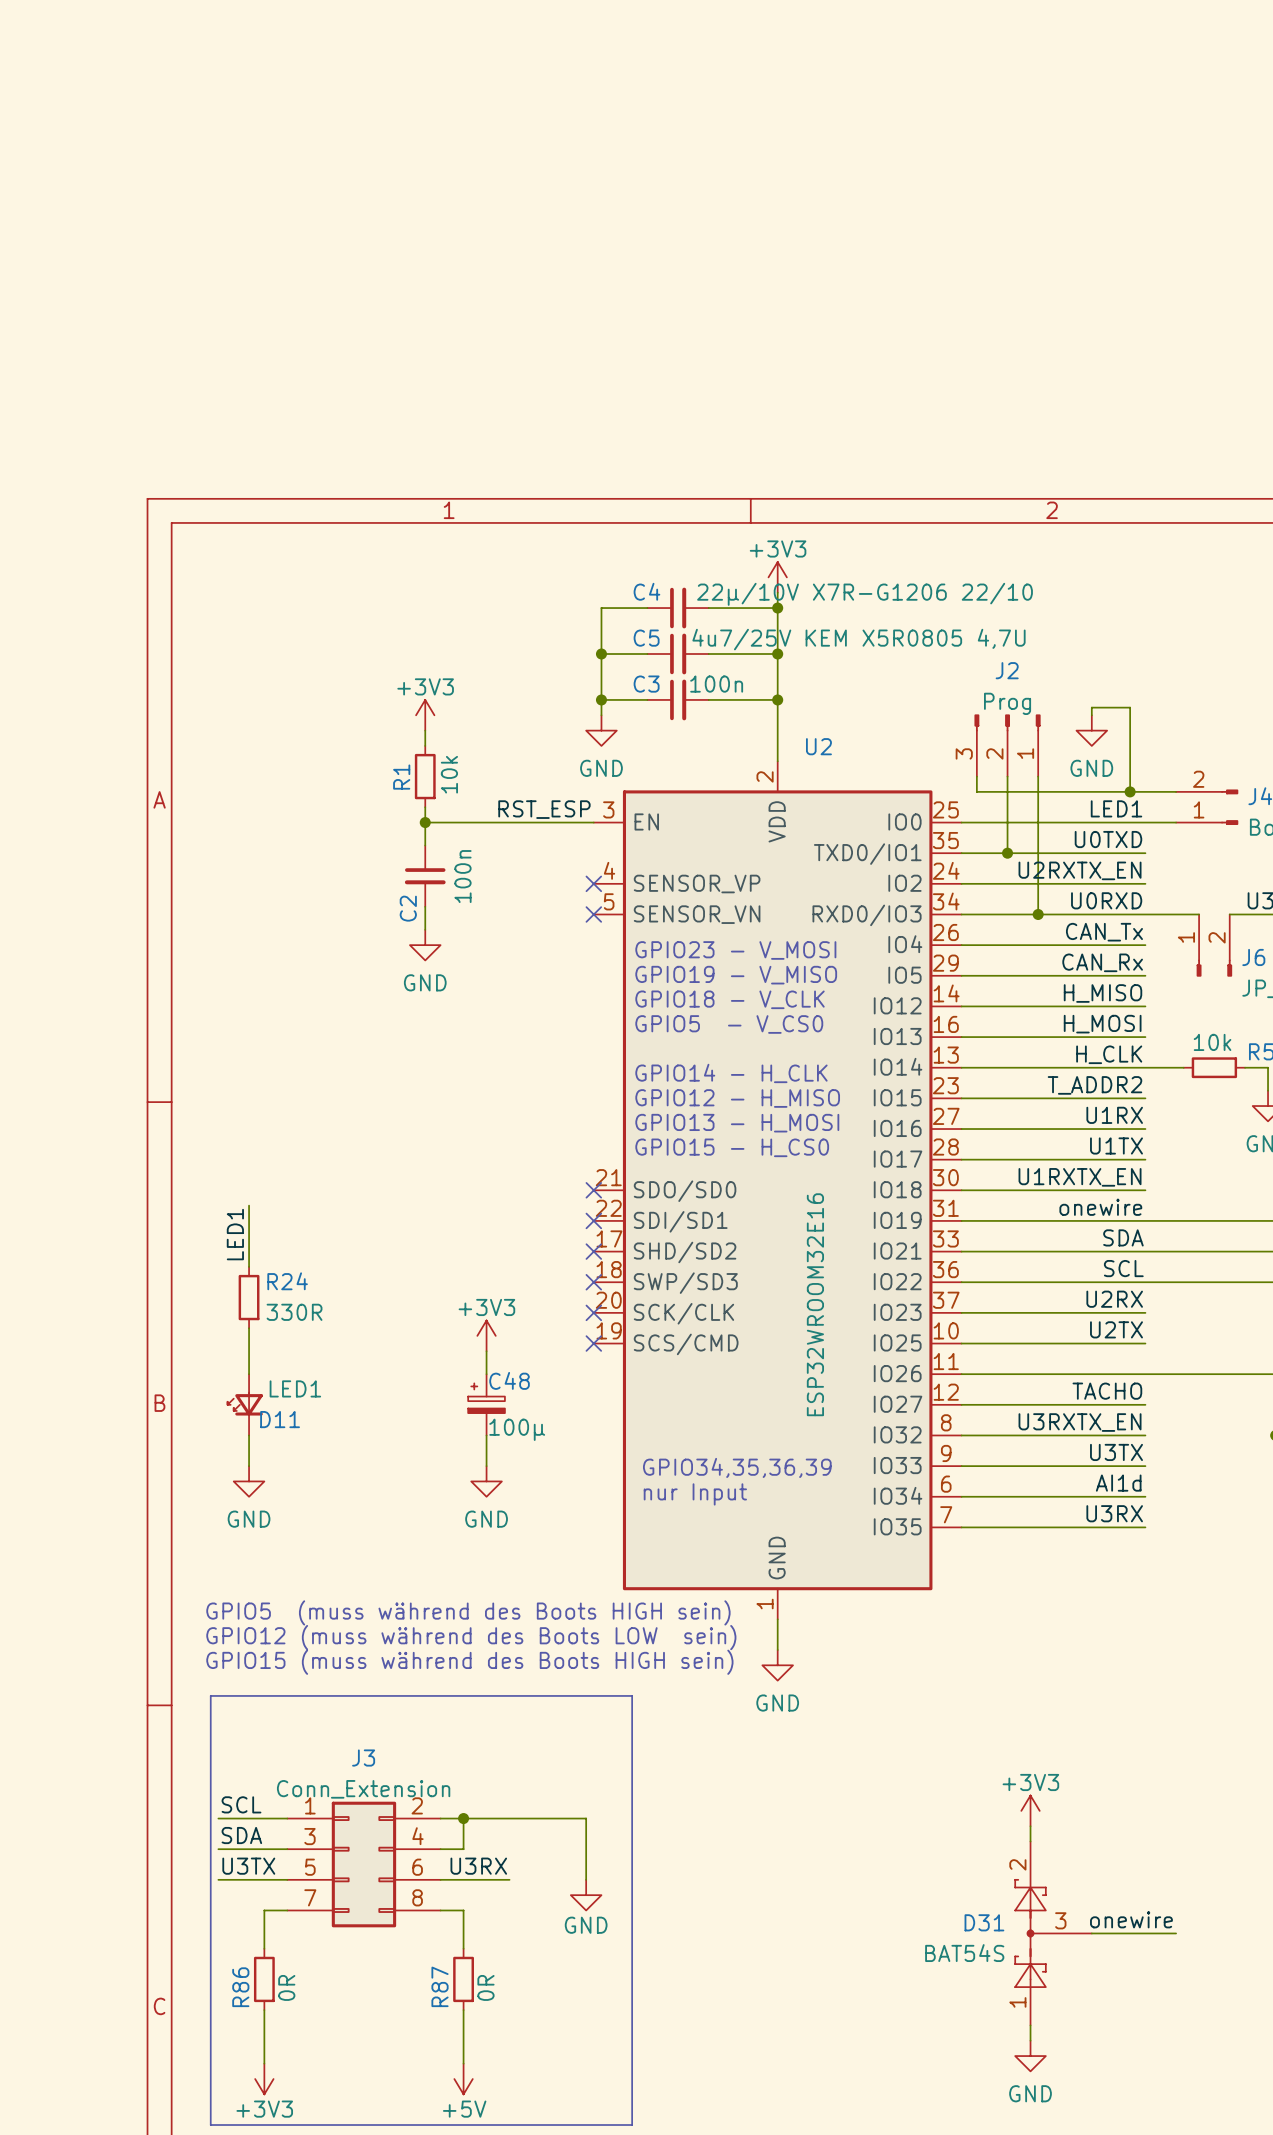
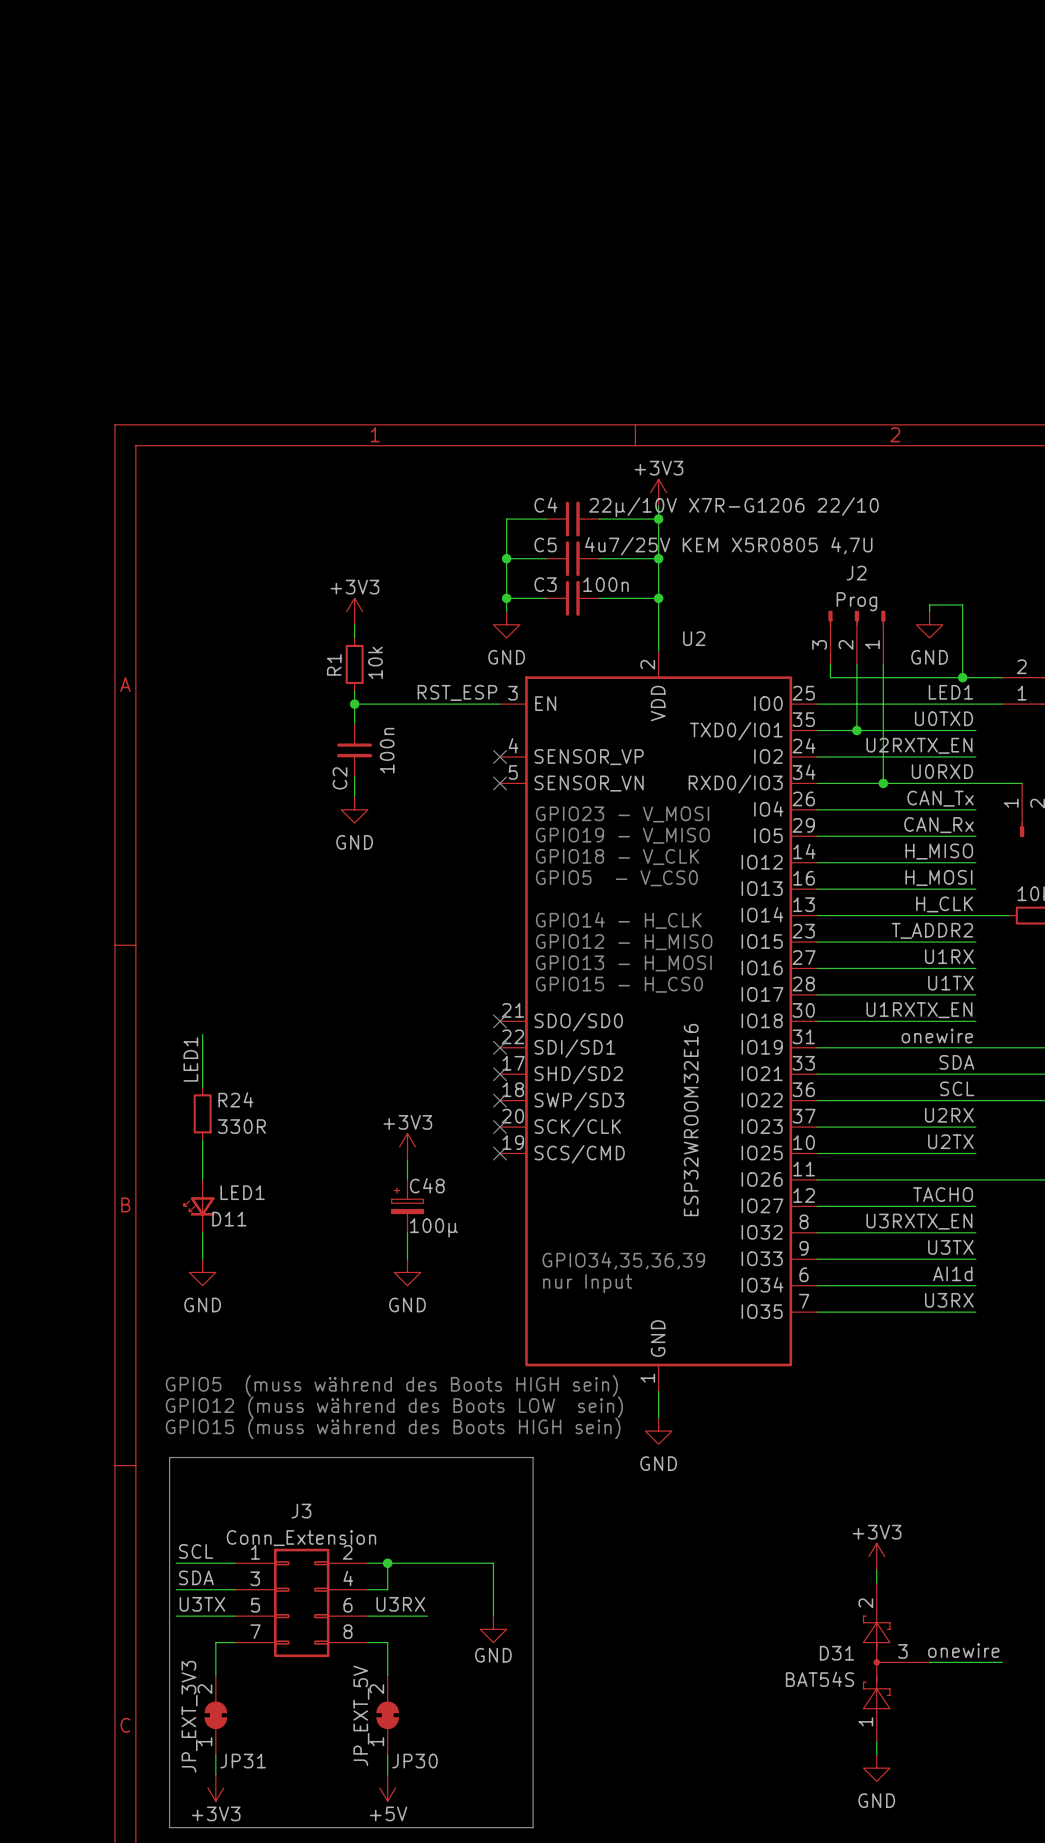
R86: 0R (264, 1979) -> none
R87: 0R (463, 1979) -> none
JP31: none -> JP_EXT_3V3 (215, 1715)
JP30: none -> JP_EXT_5V (387, 1715)

